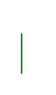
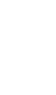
wire: (21, 33) (21, 73) -> none

